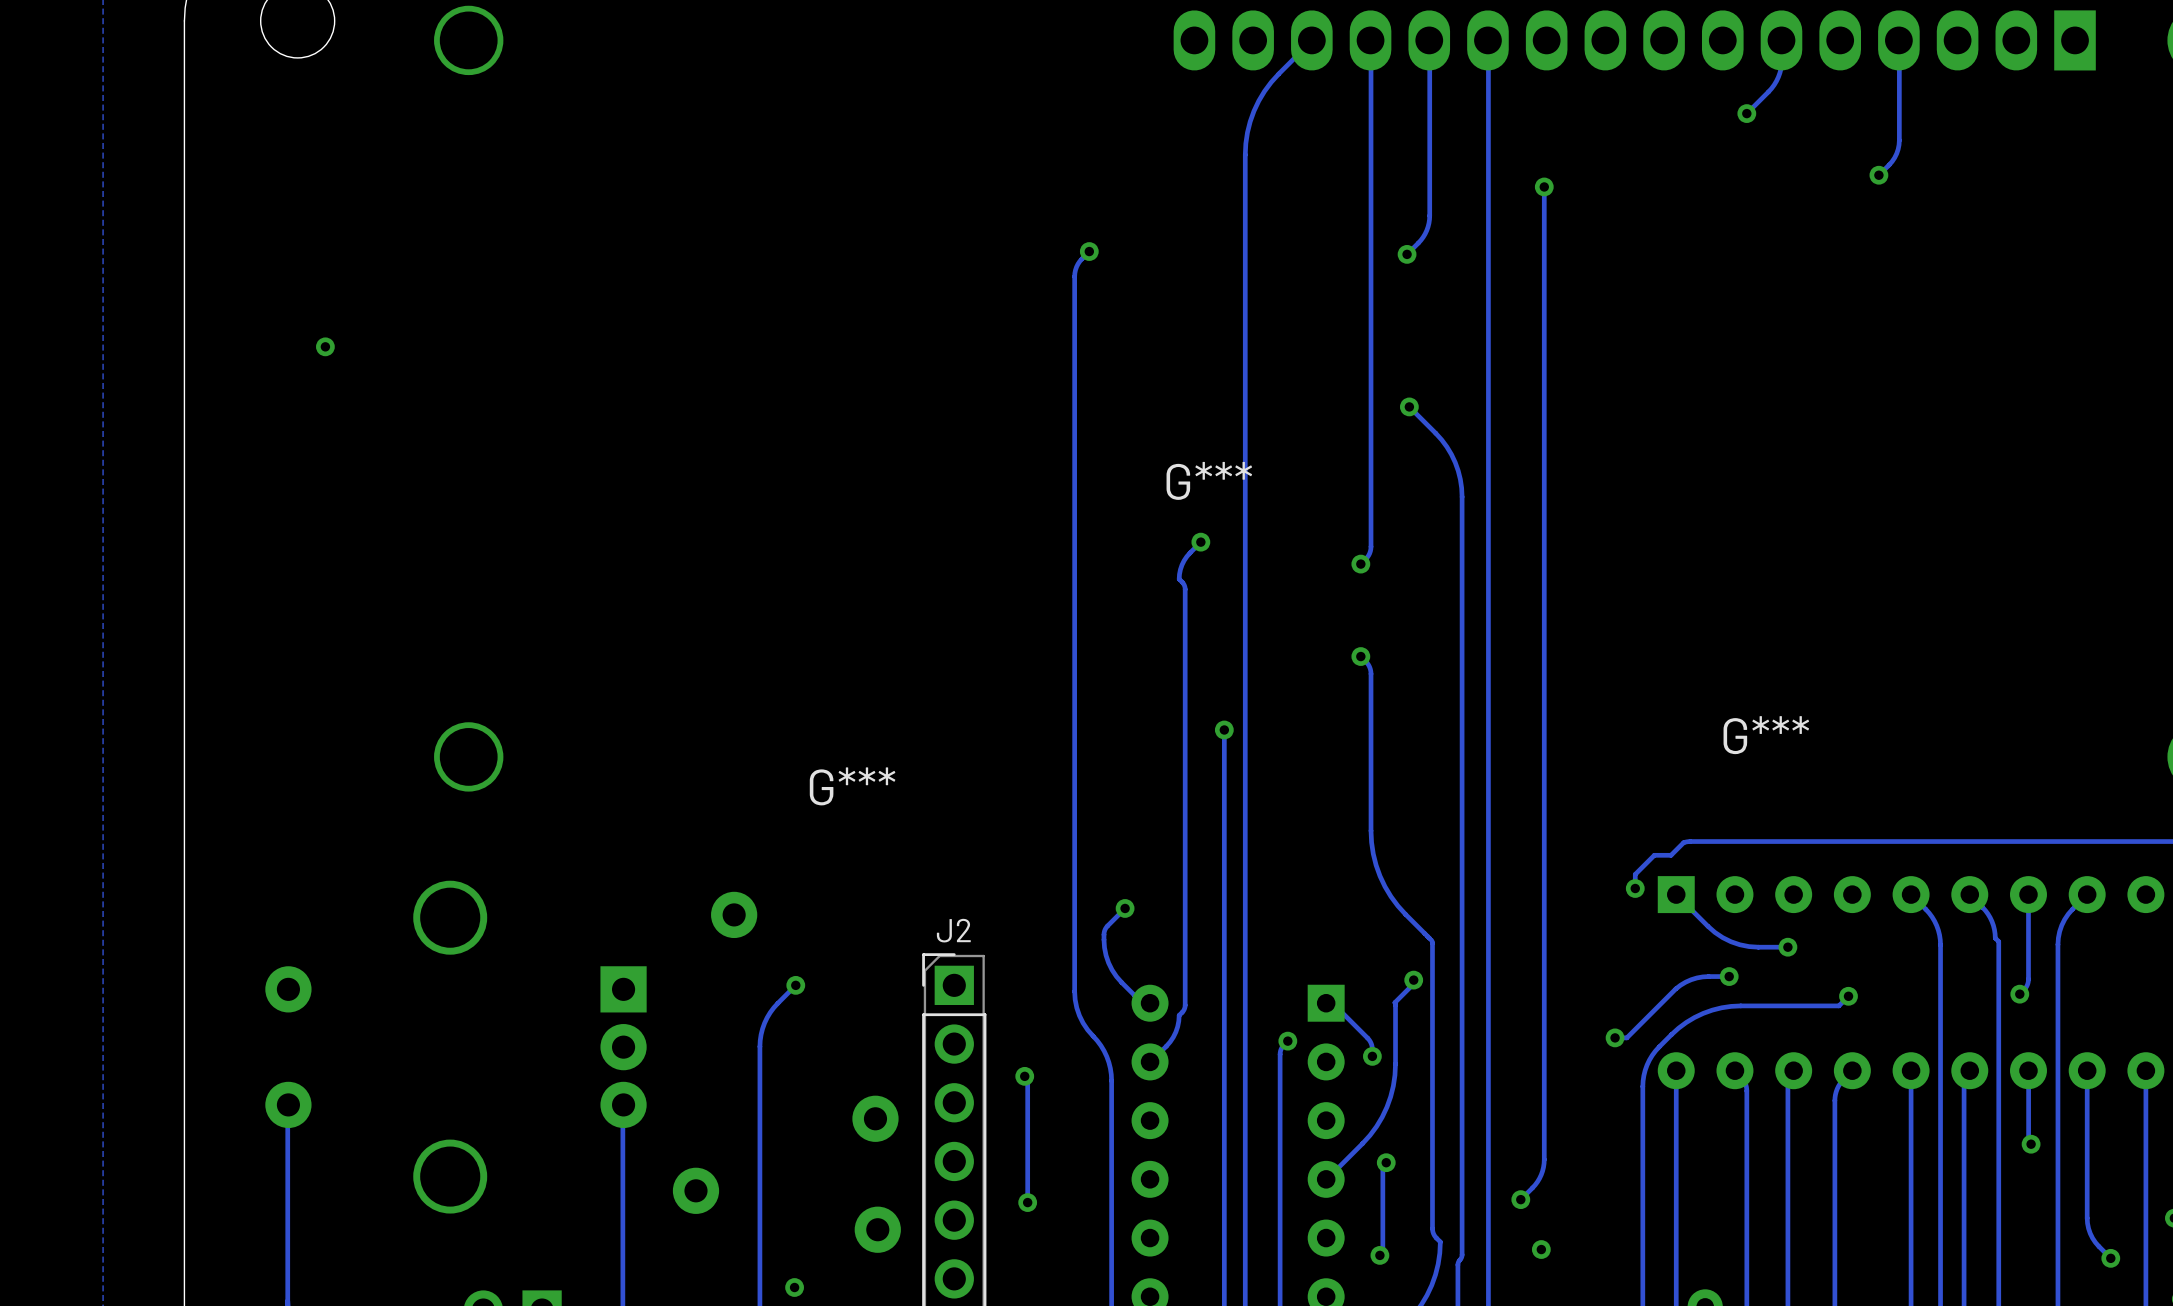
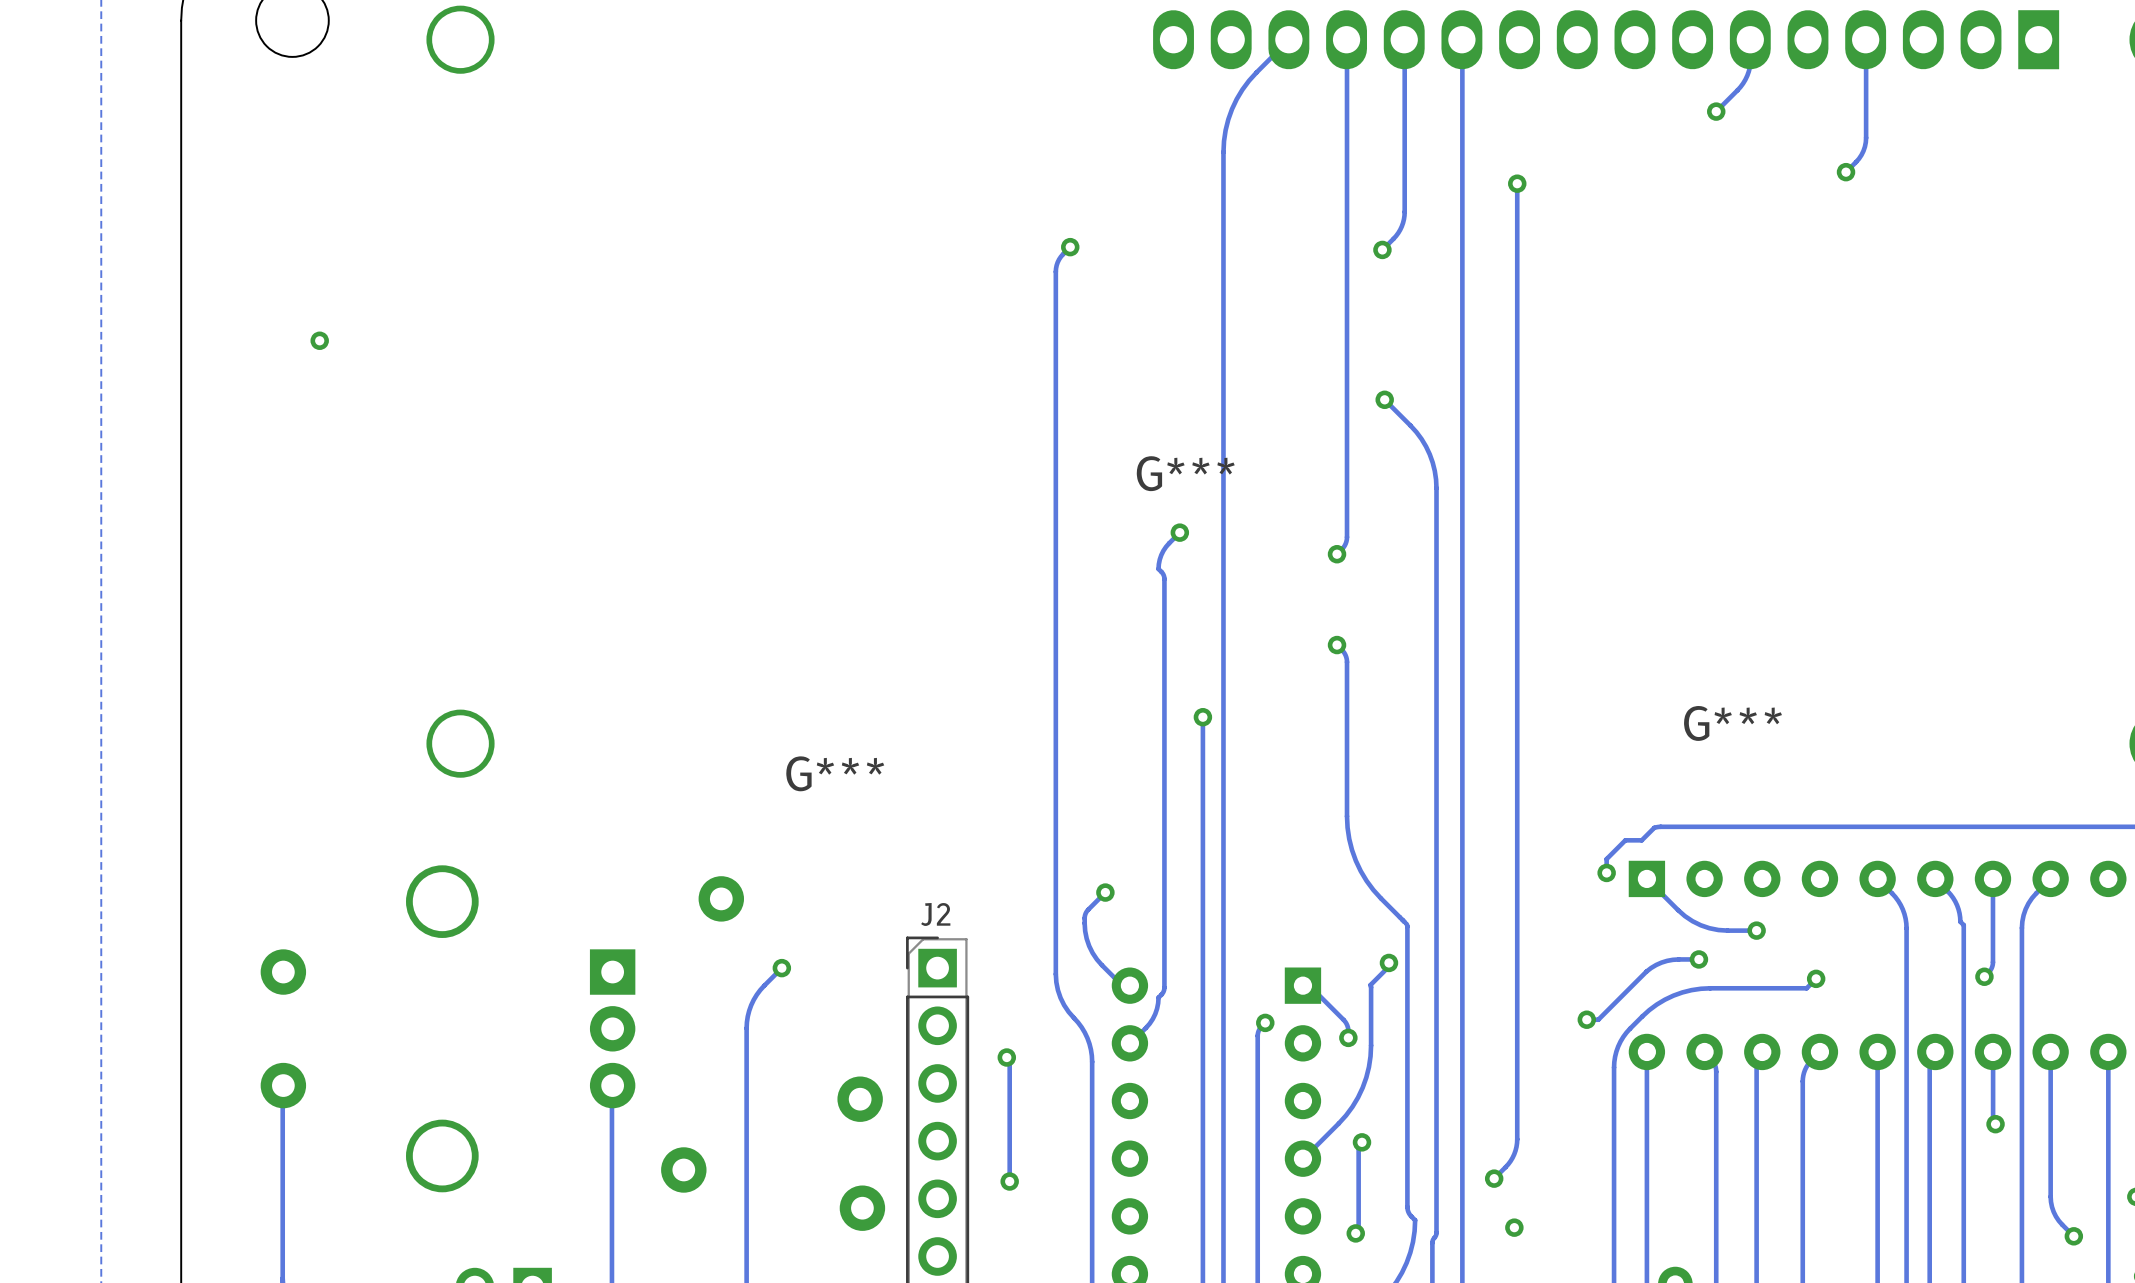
via: (794, 1287) -> none

